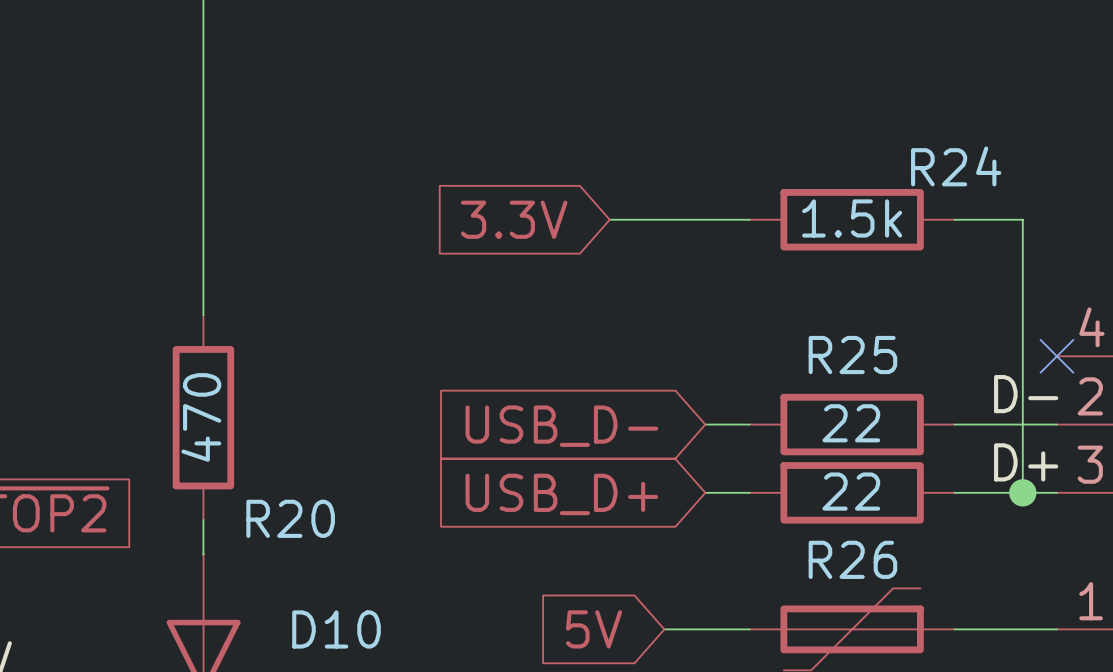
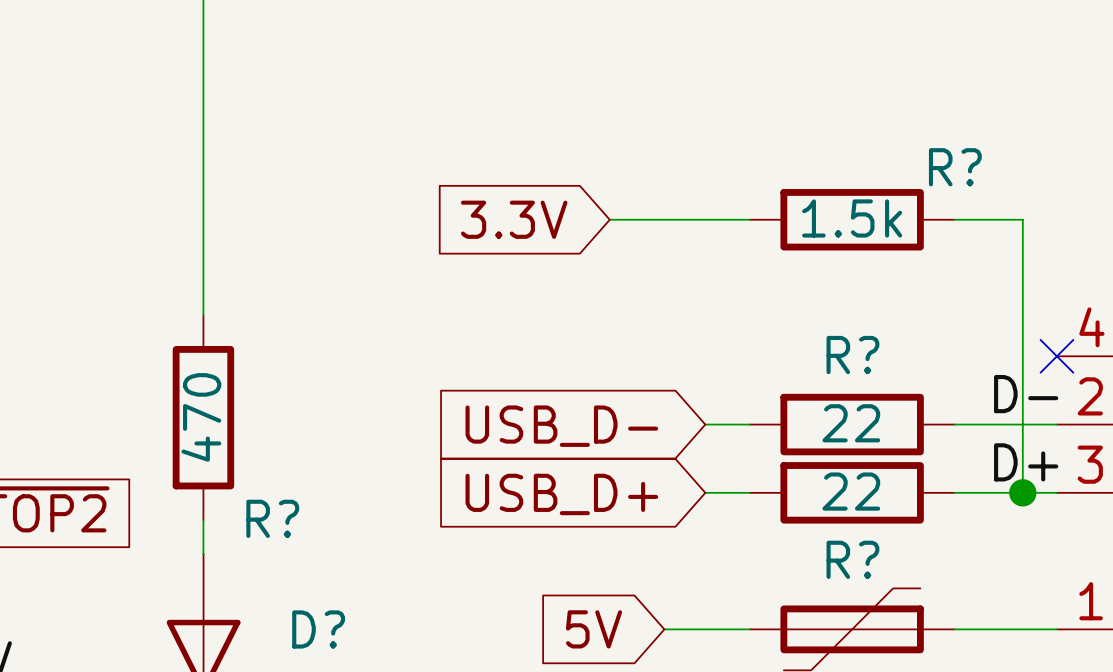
R24 name: R24 (956, 166) -> R? (955, 167)
R25 name: R25 (852, 355) -> R? (852, 355)
R20 name: R20 (290, 518) -> R? (272, 518)
R26 name: R26 (852, 559) -> R? (852, 559)
D10 name: D10 (336, 629) -> D? (318, 629)

